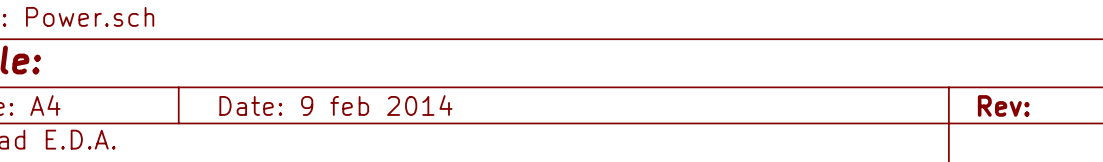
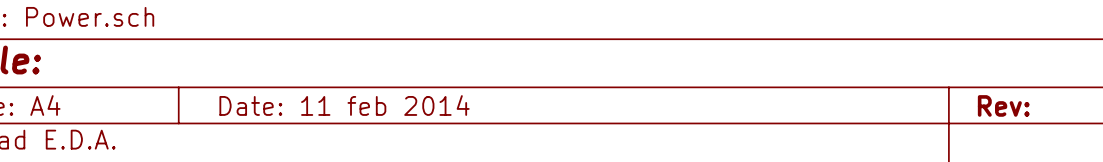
title block: Date: 9 feb 2014 (335, 105) -> Date: 11 feb 2014 (344, 105)

